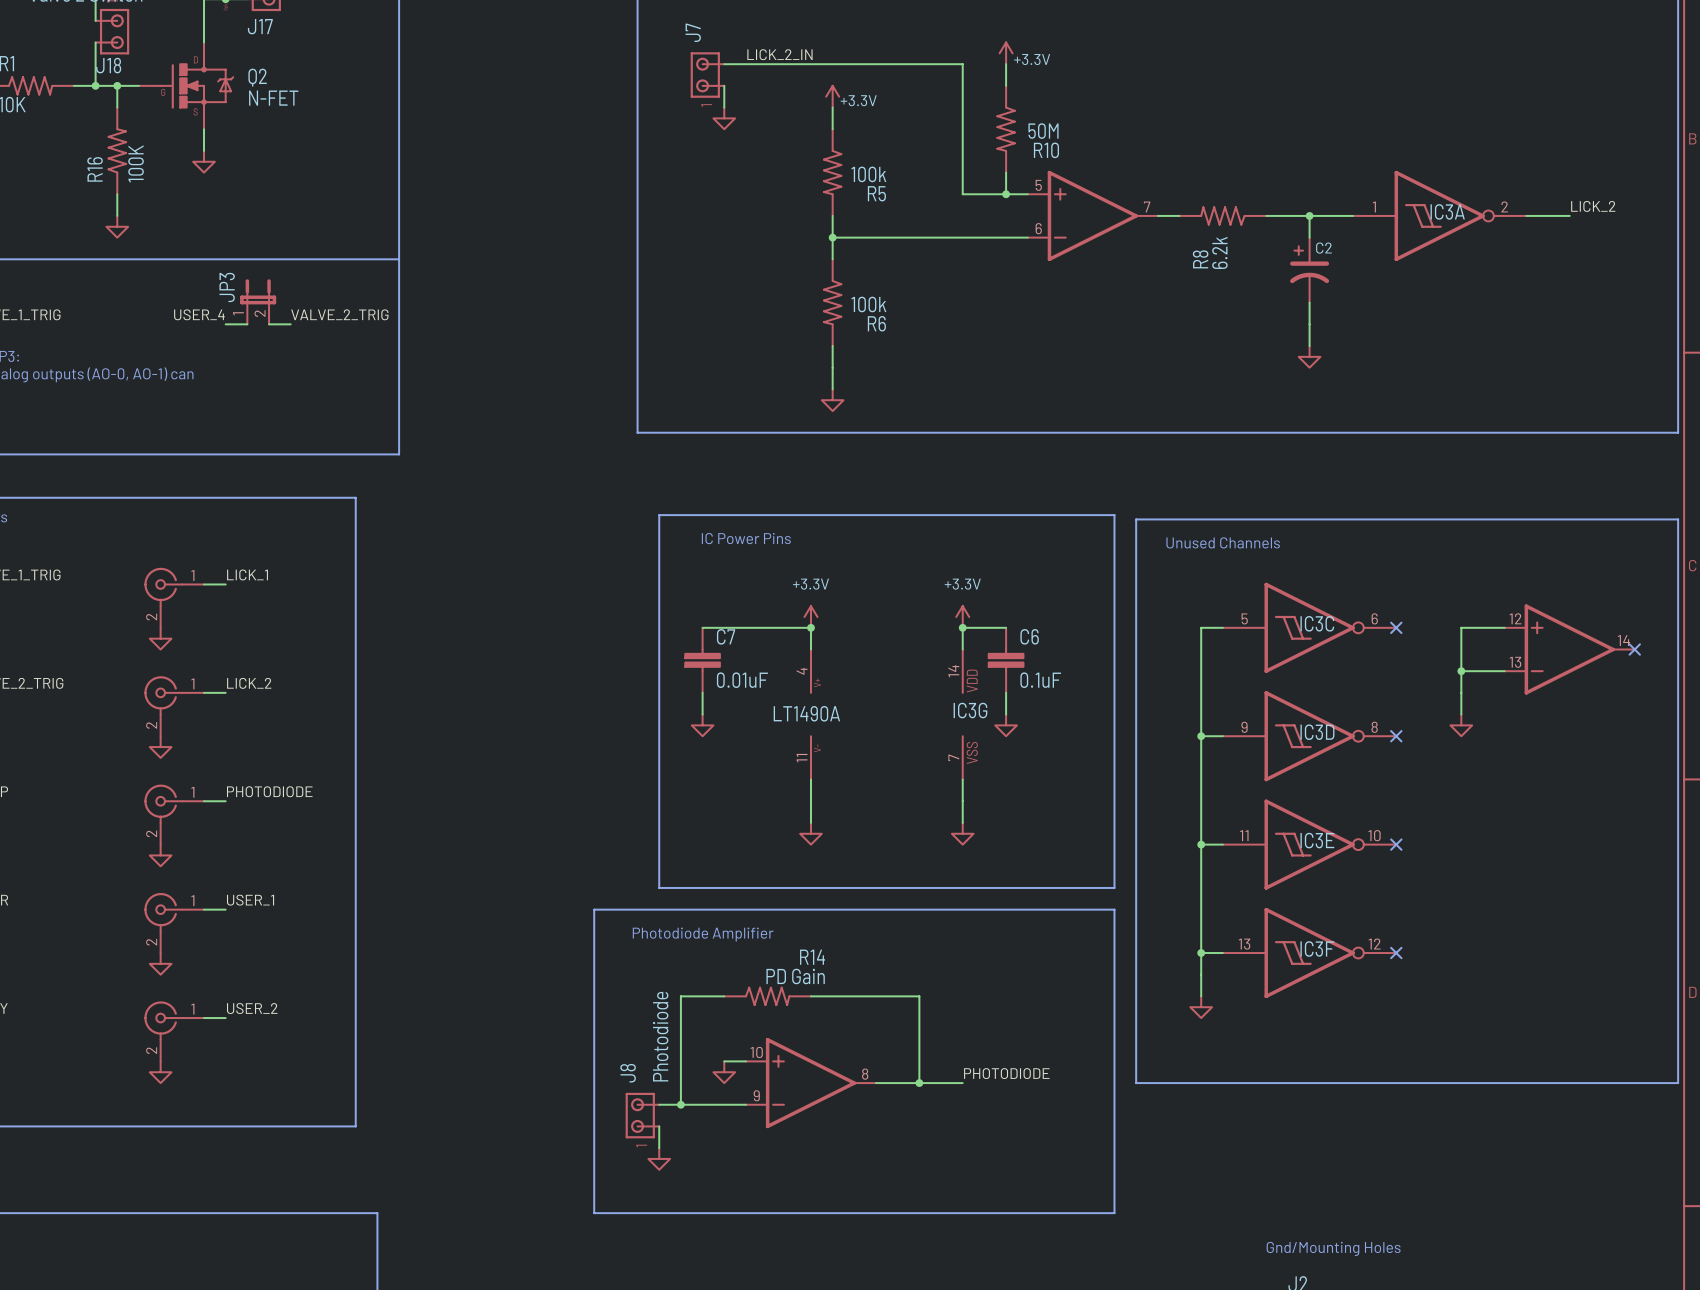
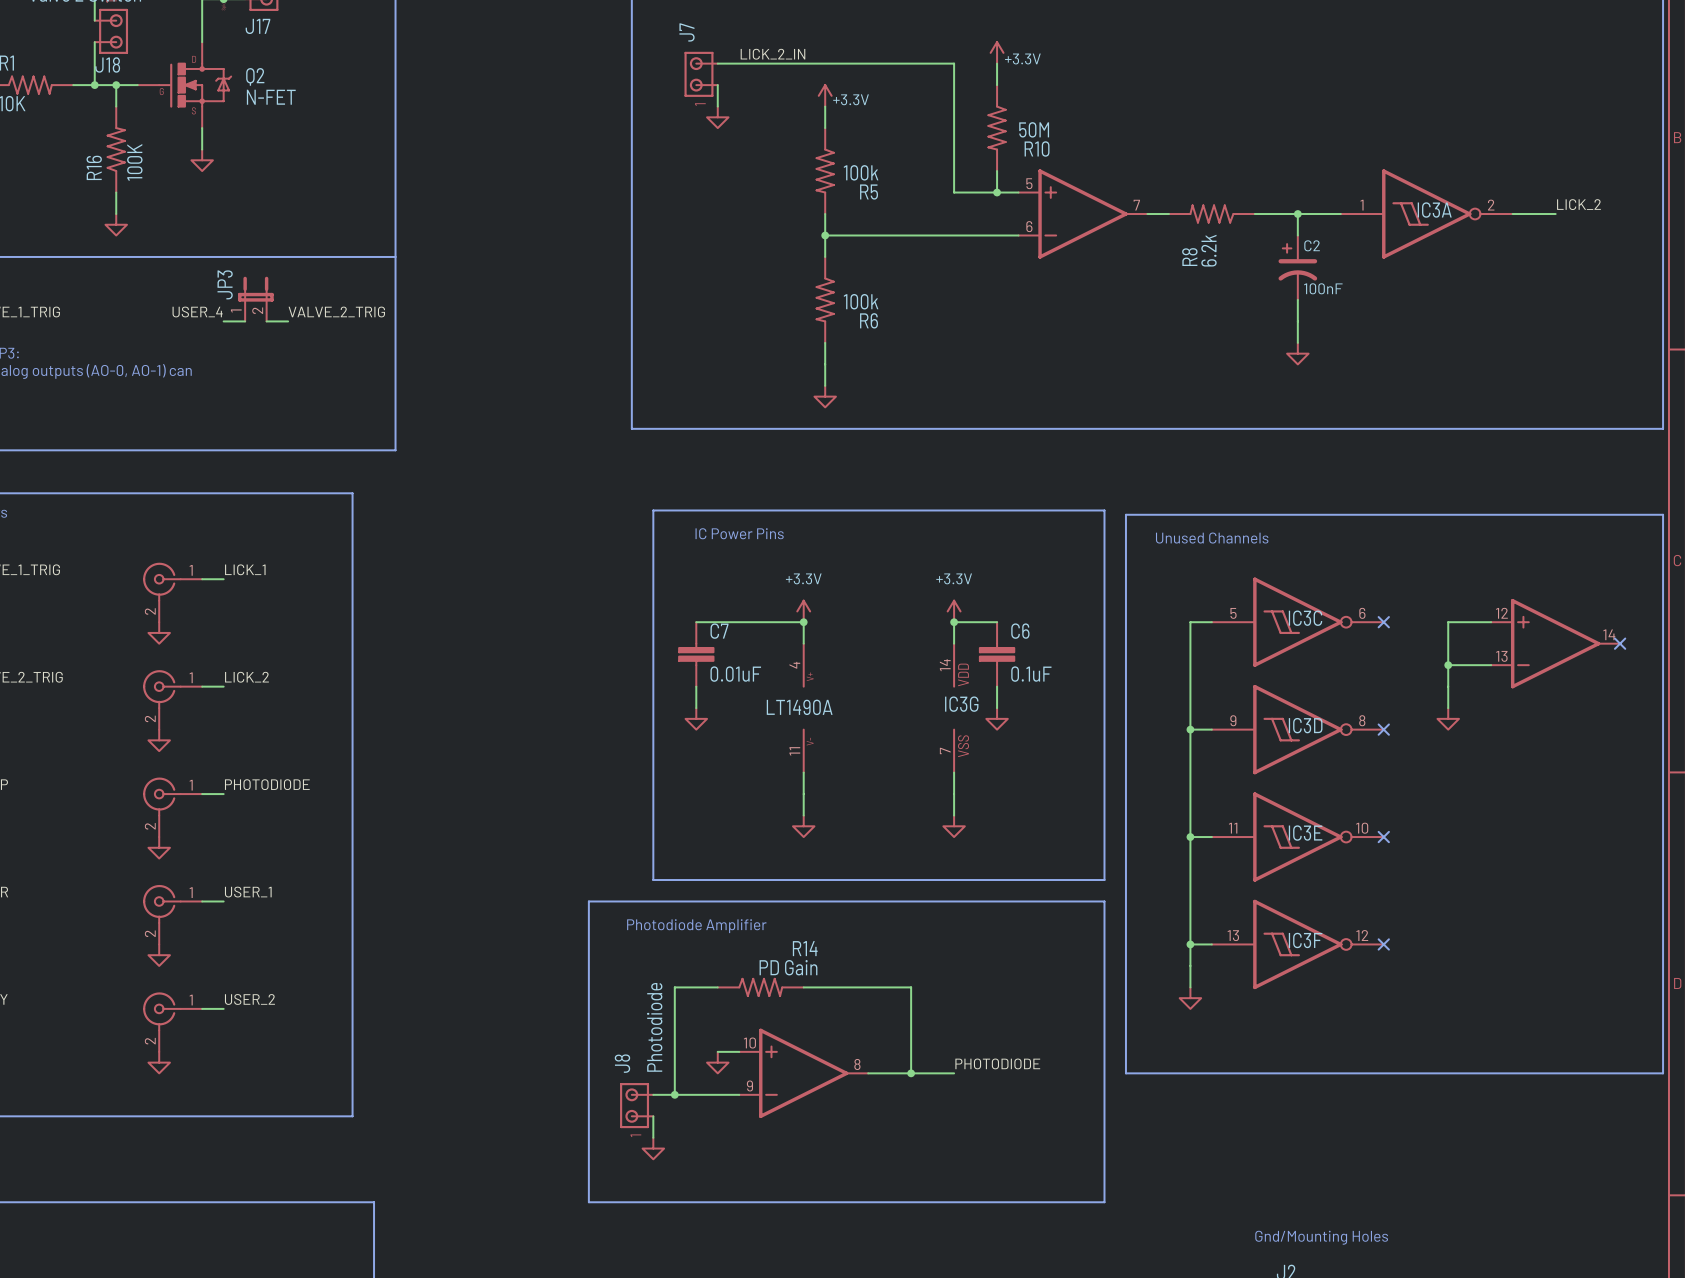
C2 value: none -> 100nF (1323, 288)

